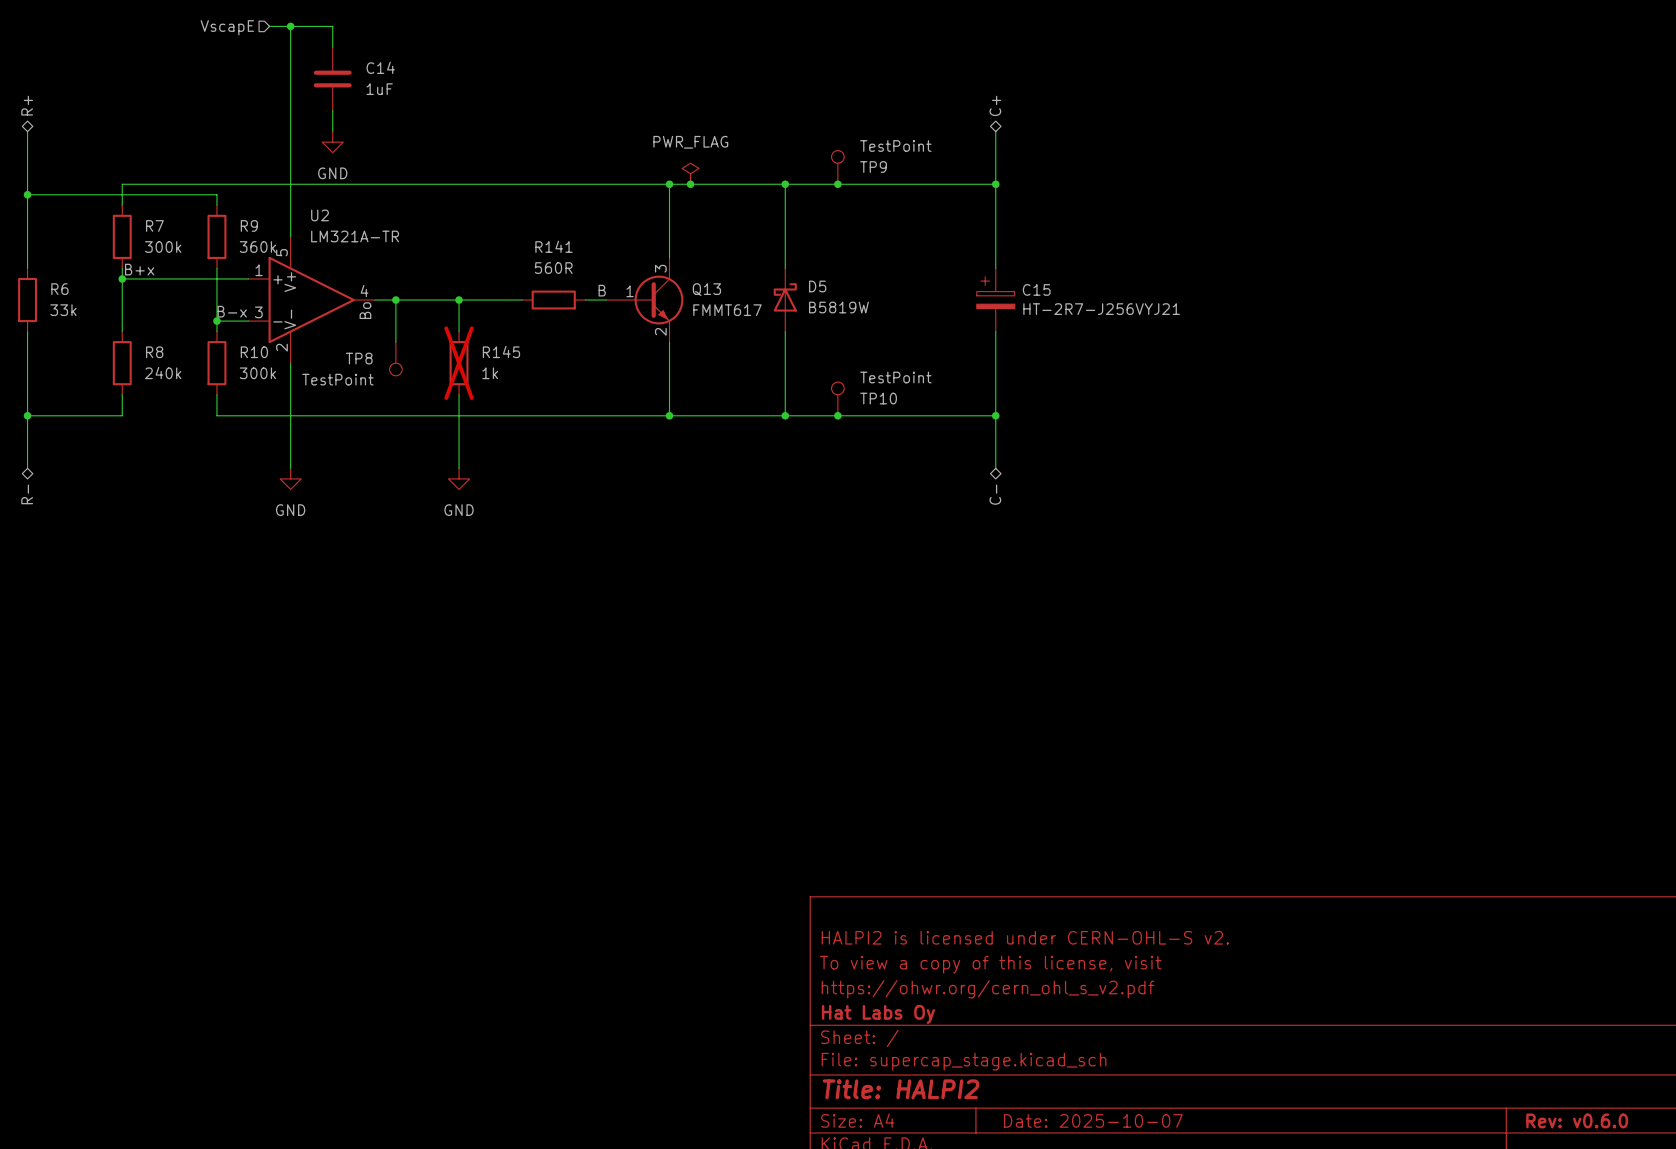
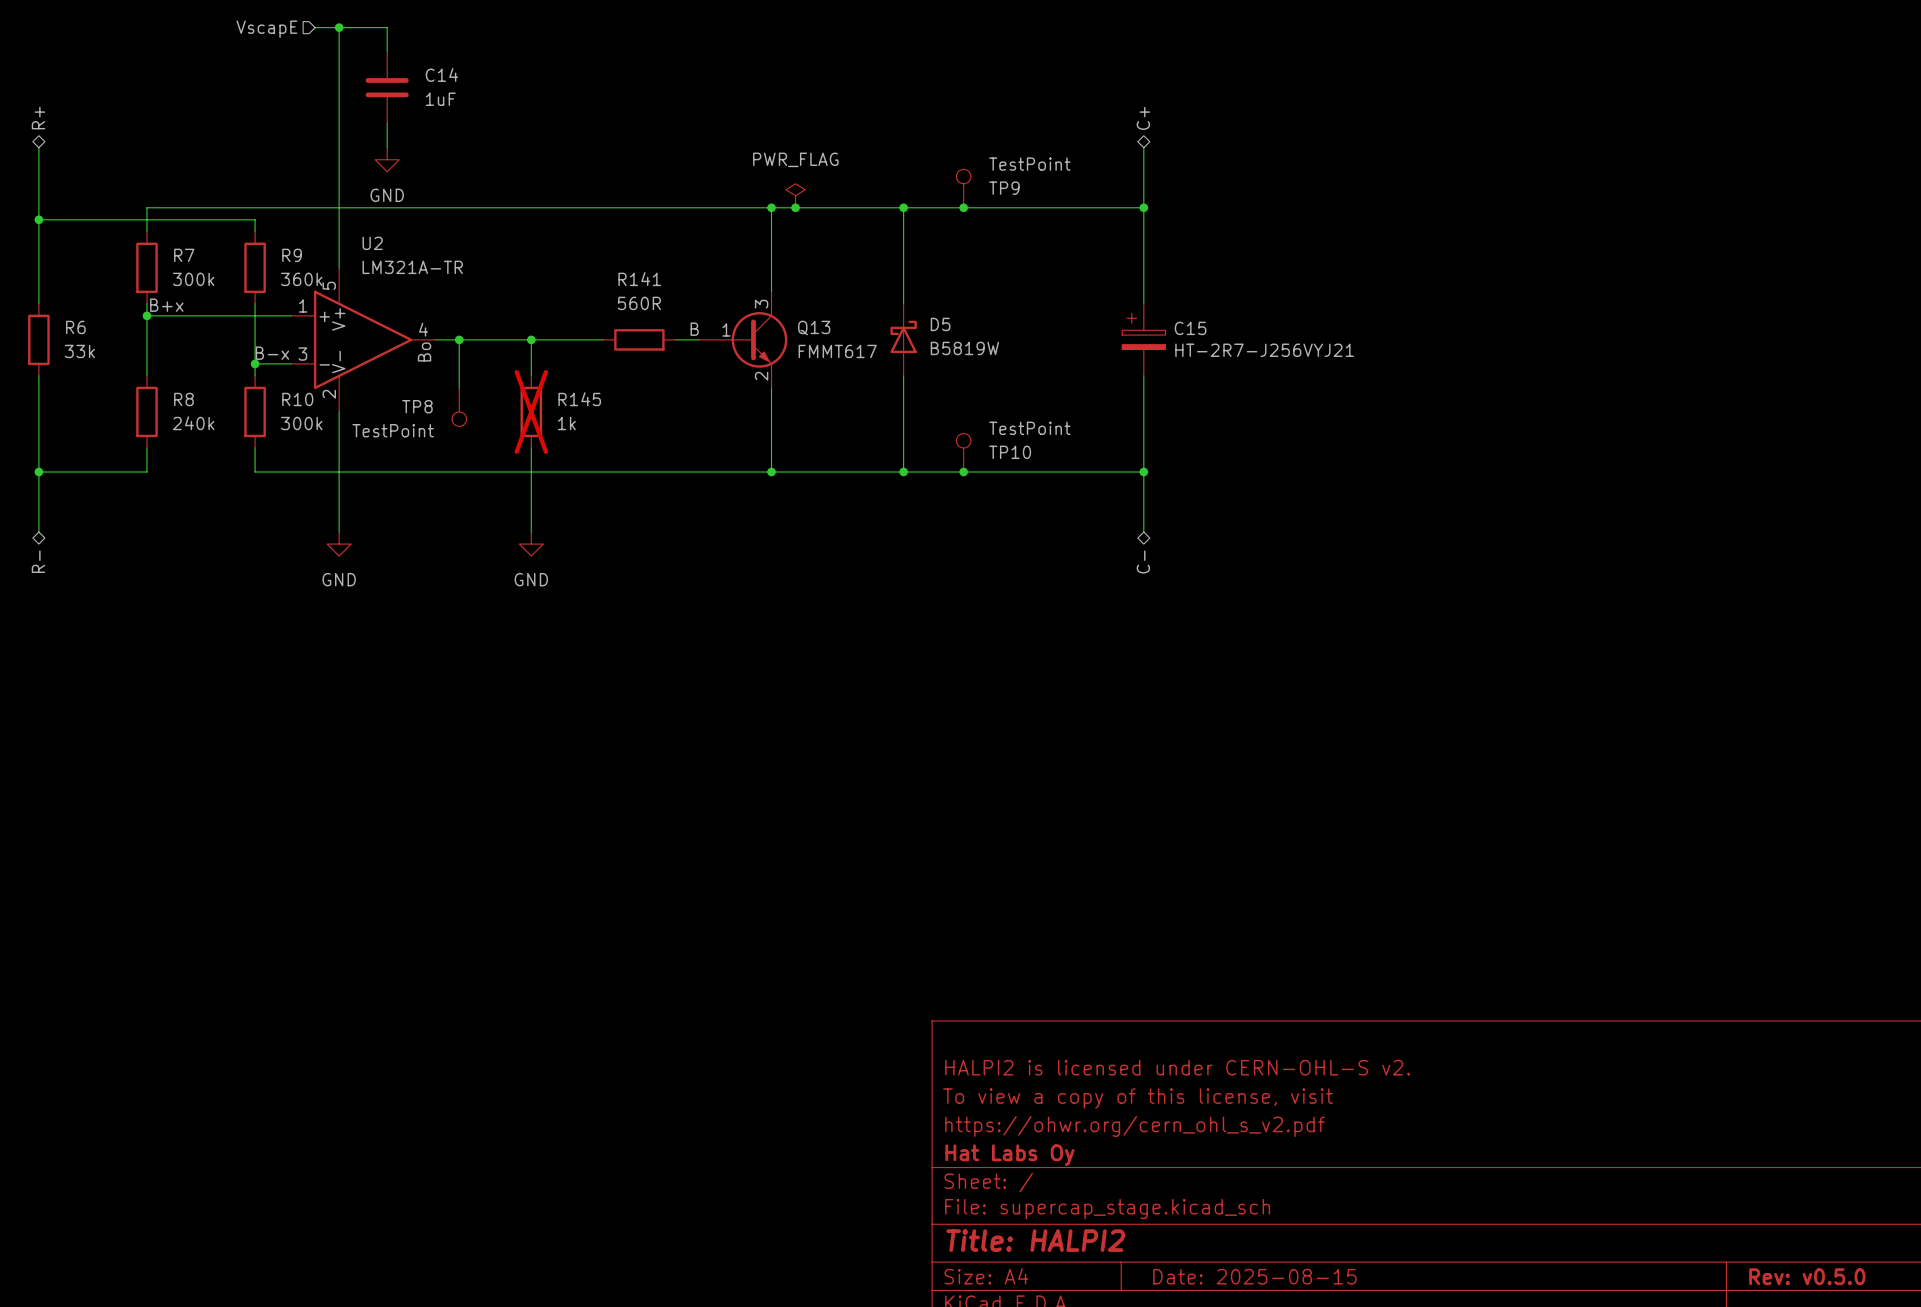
title block: Date: 2025-10-07 (1093, 1120) -> Date: 2025-08-15 (1254, 1276)
title block: Rev: v0.6.0 (1577, 1120) -> Rev: v0.5.0 (1807, 1276)

